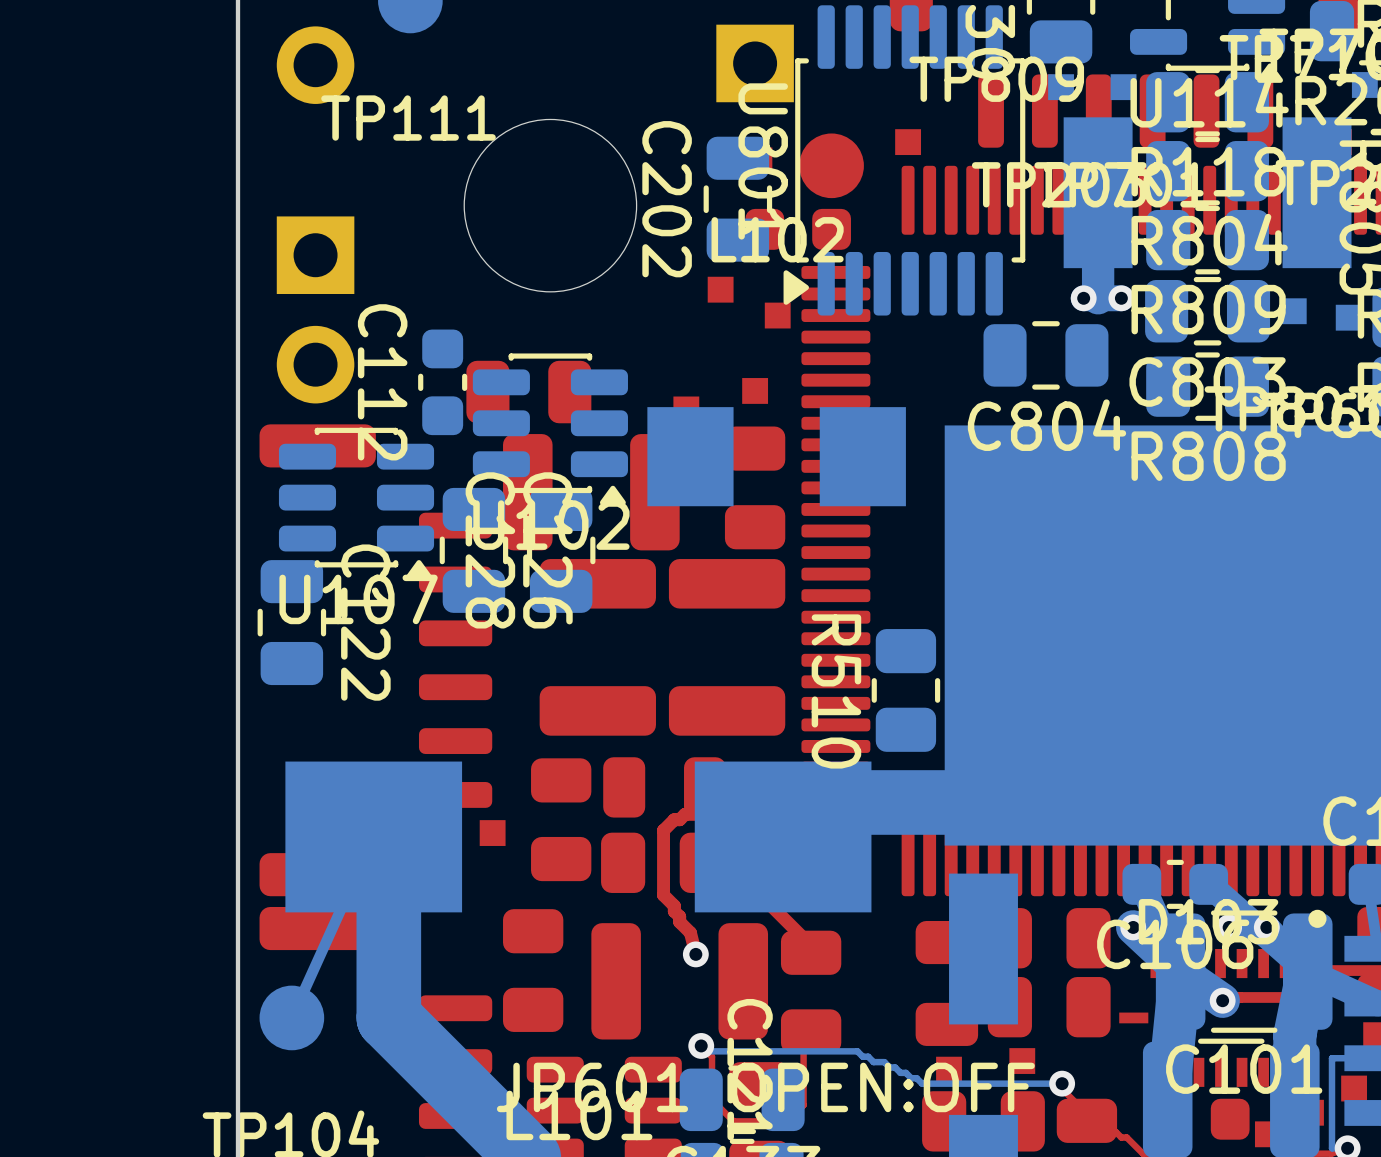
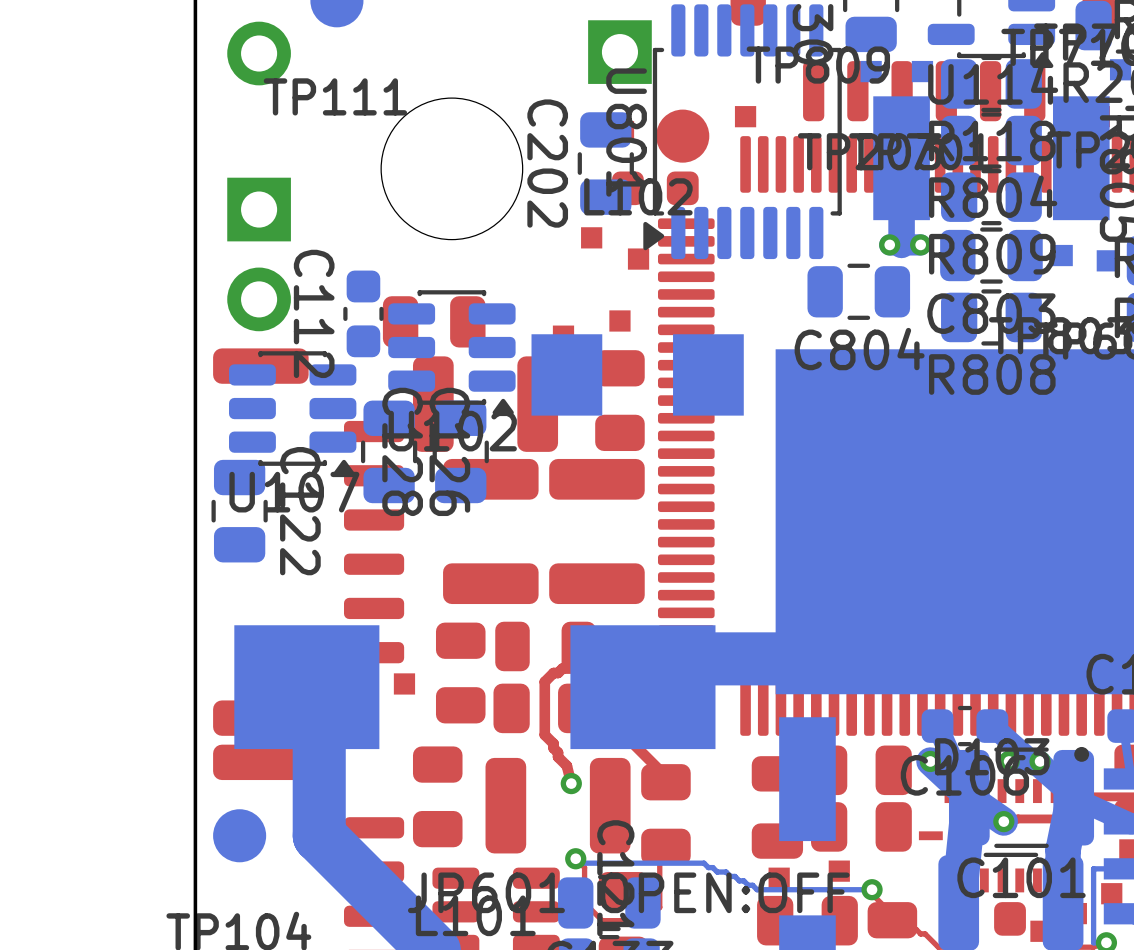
R510: (905, 690) -> none
bottom track: (373, 836) (291, 1017) -> none

